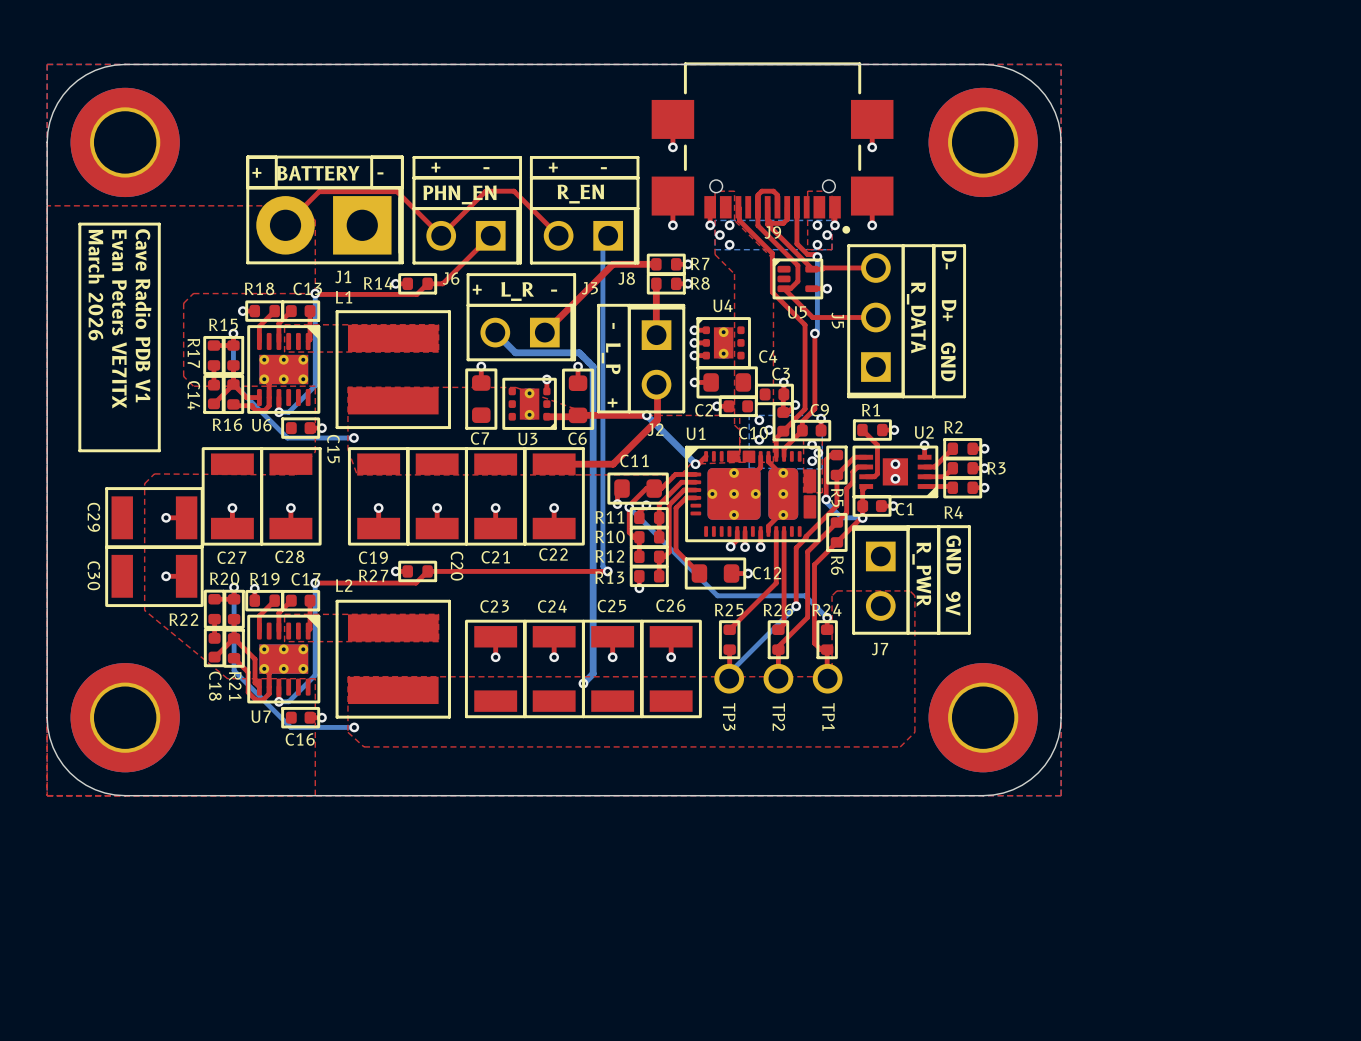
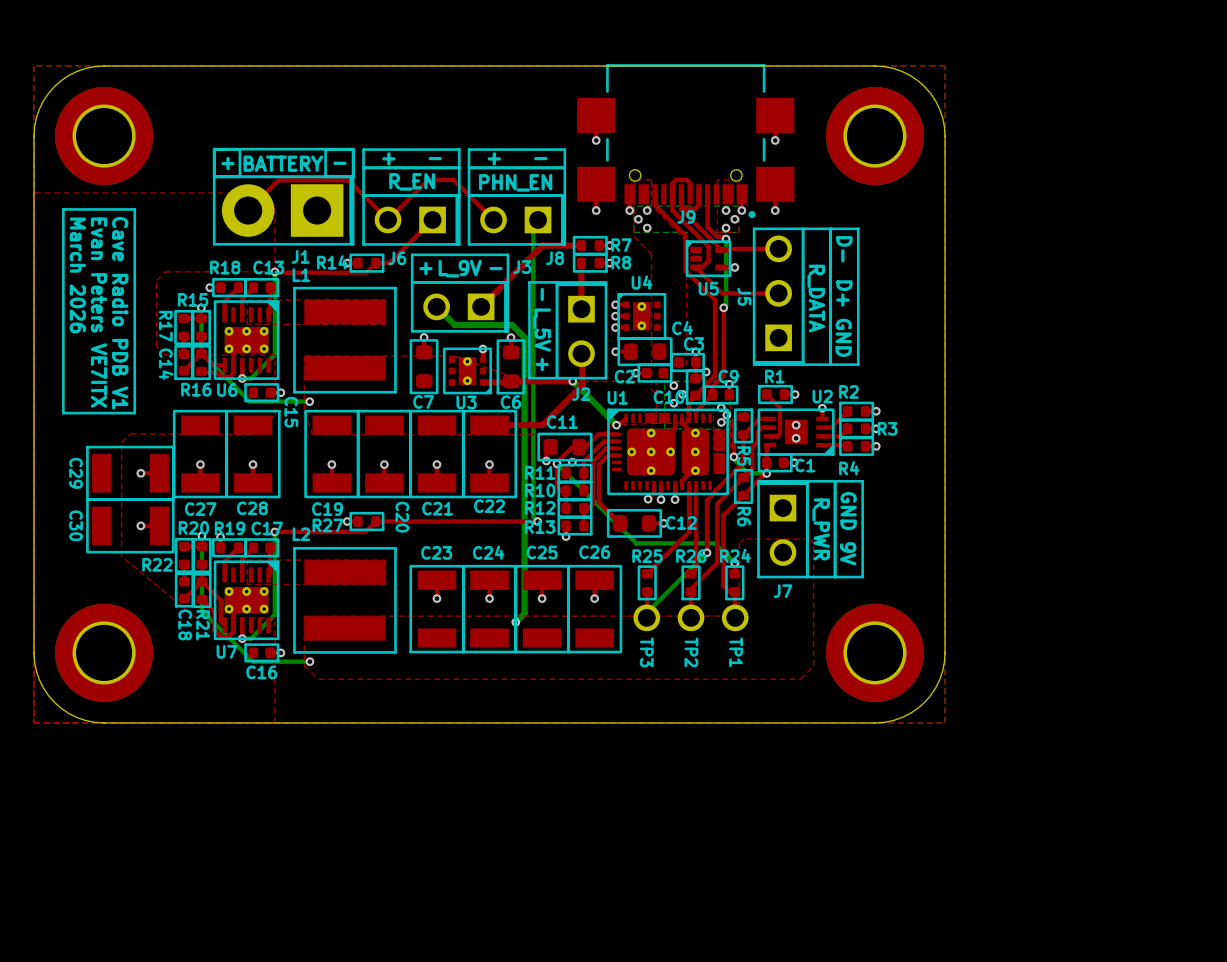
text: PHN_EN (459, 194) -> R_EN (412, 181)
text: R_EN (580, 194) -> PHN_EN (515, 182)
text: L_R (517, 291) -> L_9V (460, 268)
text: L_P (611, 358) -> L_5V (542, 330)

